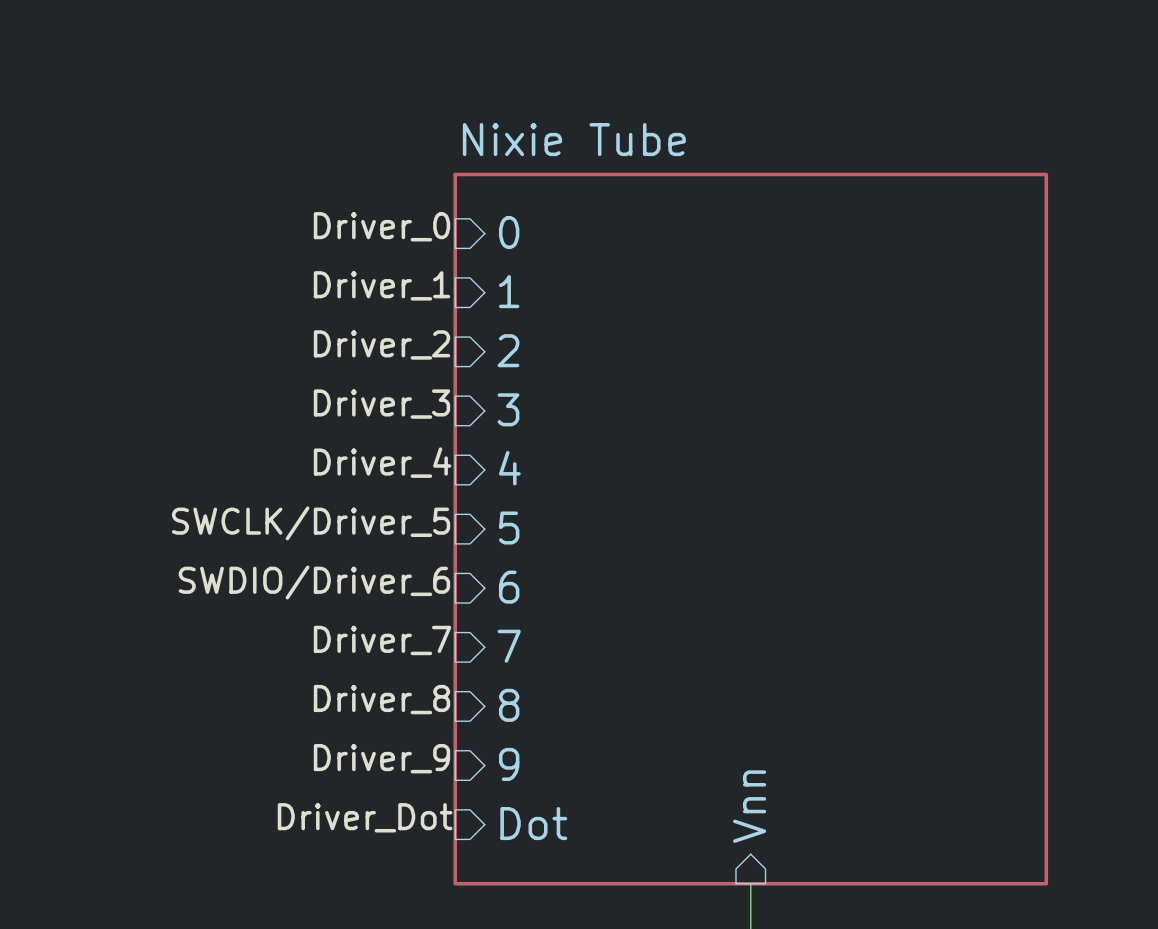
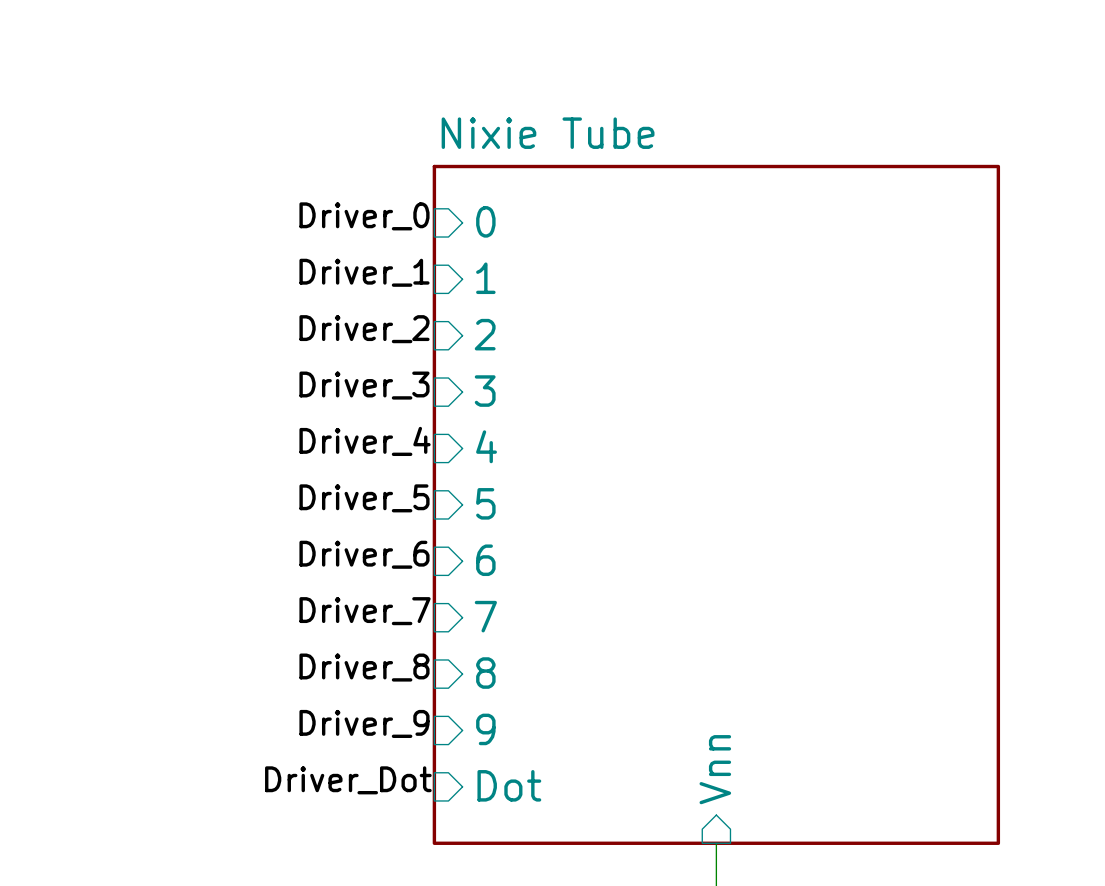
label: SWCLK/Driver_5 (311, 523) -> Driver_5 (364, 498)
label: SWDIO/Driver_6 (314, 582) -> Driver_6 (364, 554)

